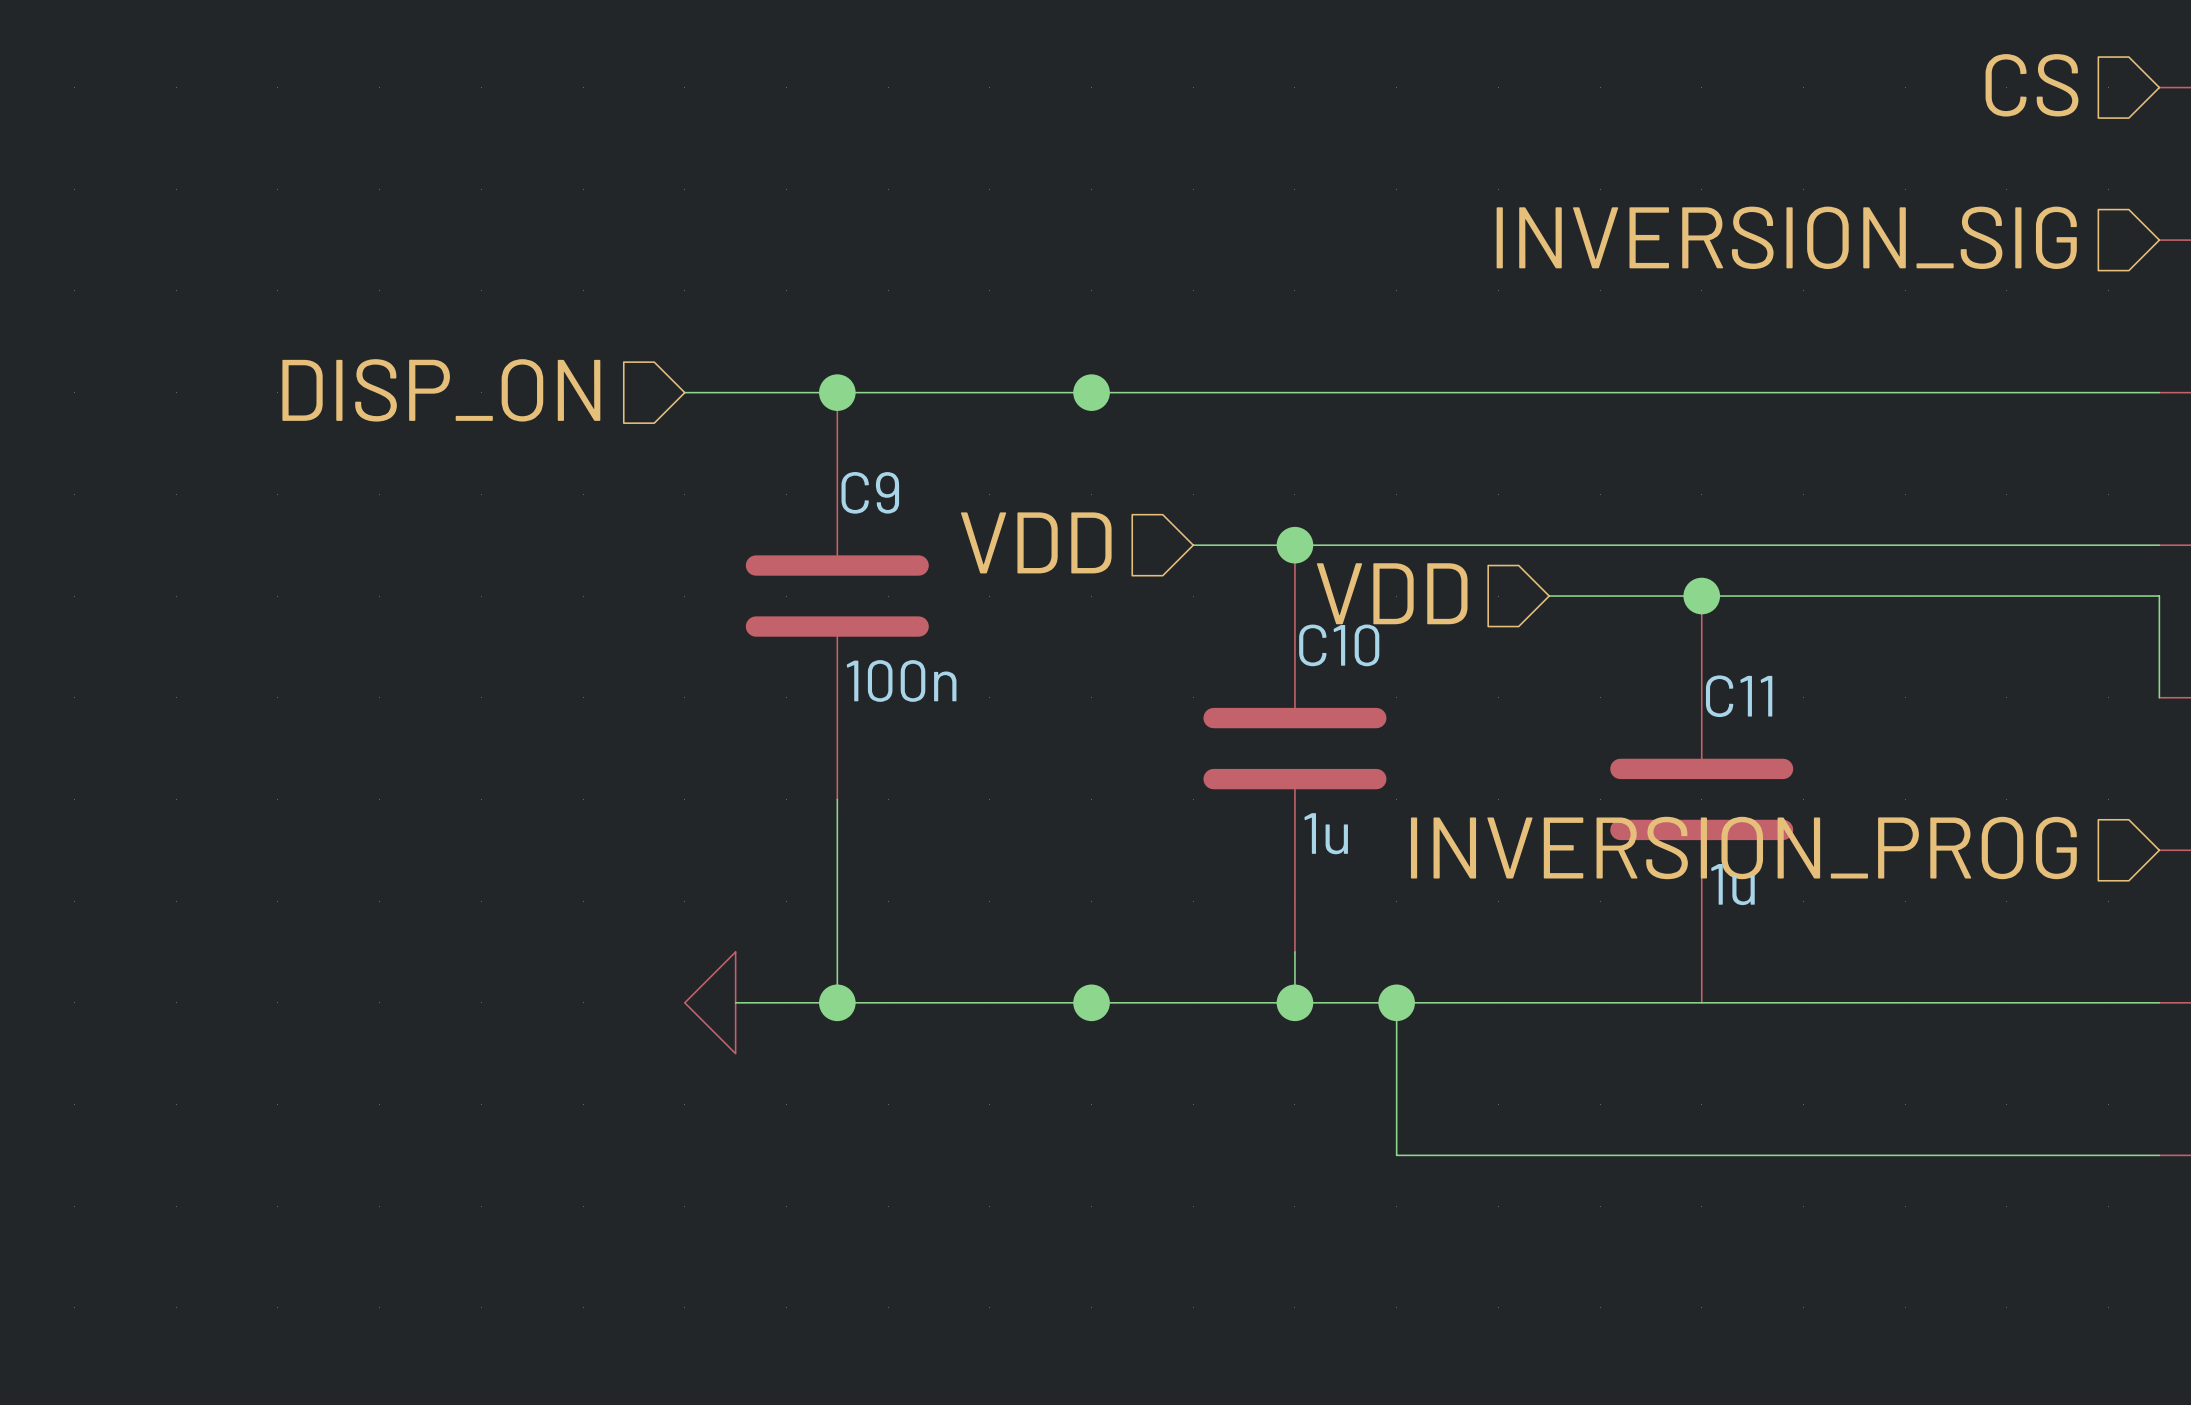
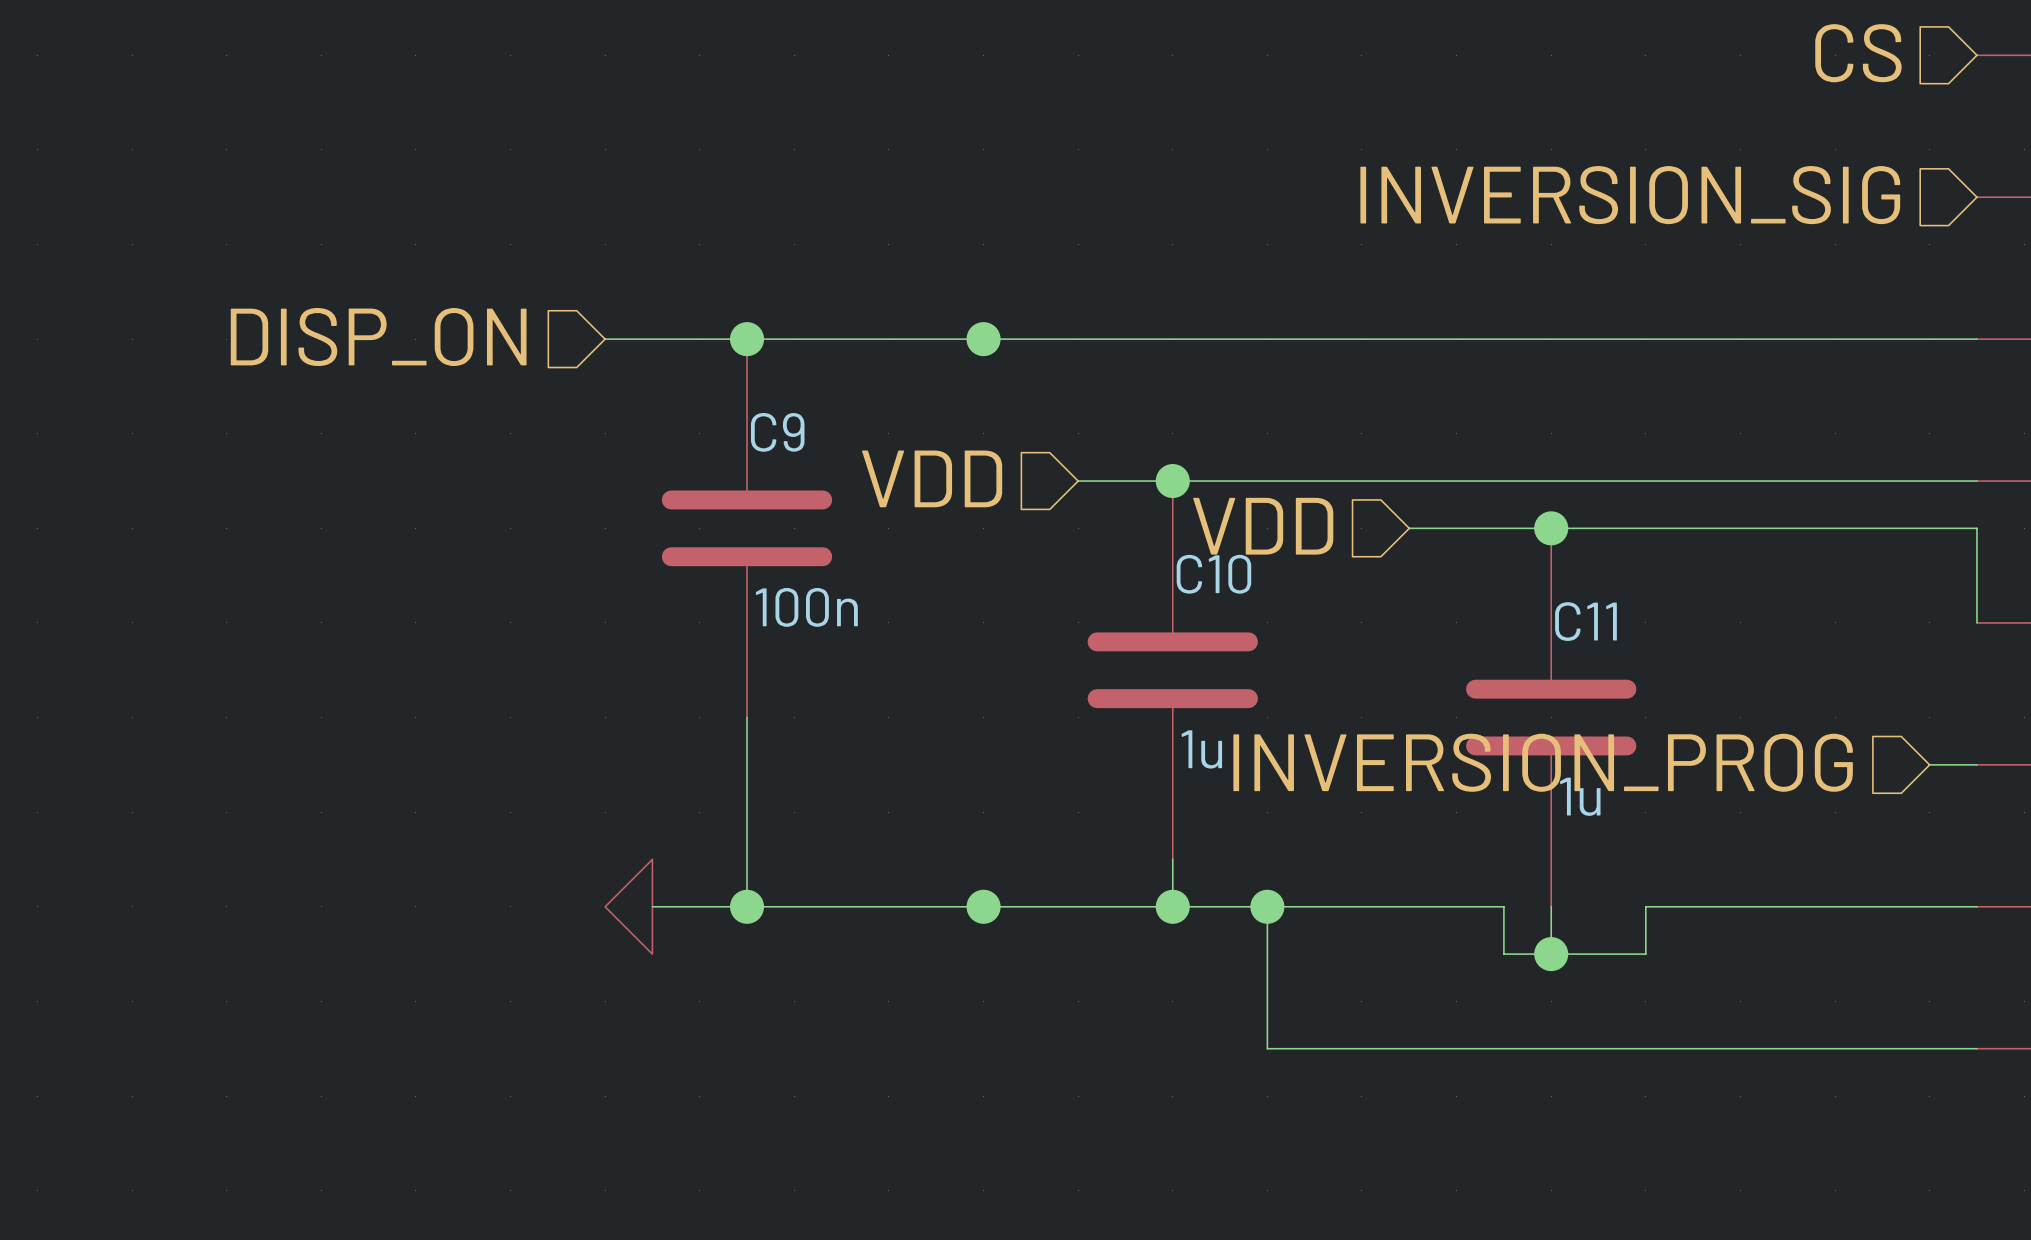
hierarchical label position: INVERSION_PROG (1743, 847) -> INVERSION_PROG (1543, 762)
wire: none -> (1929, 764) (1976, 764)
wire: (1650, 1002) (1803, 1002) -> (1503, 906) (1503, 954) (1645, 954) (1645, 906)
wire: none -> (1551, 906) (1551, 954)
junction: none -> (1551, 954)

